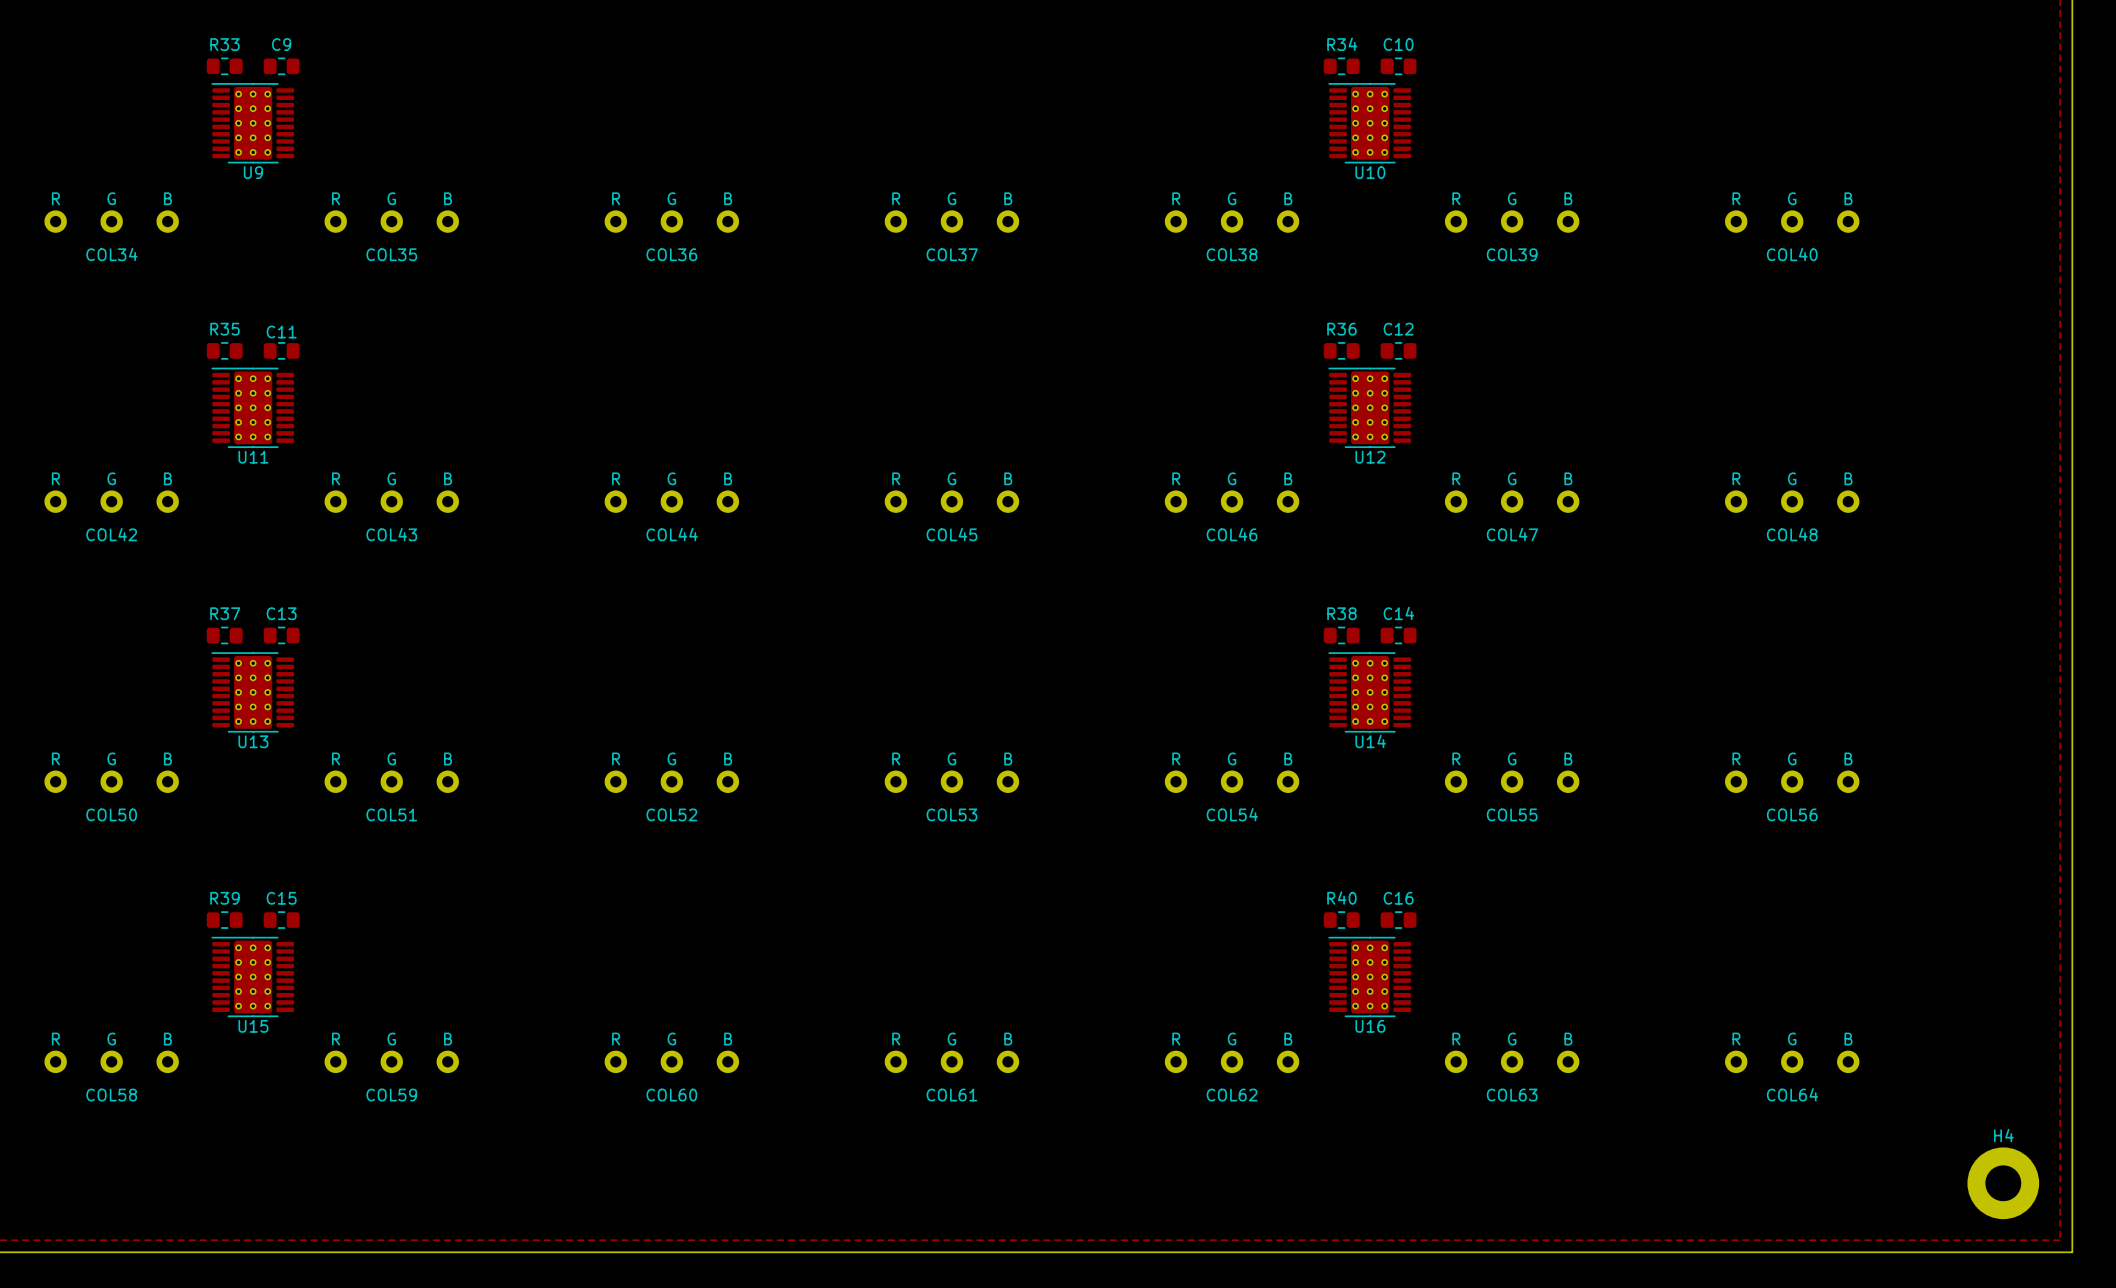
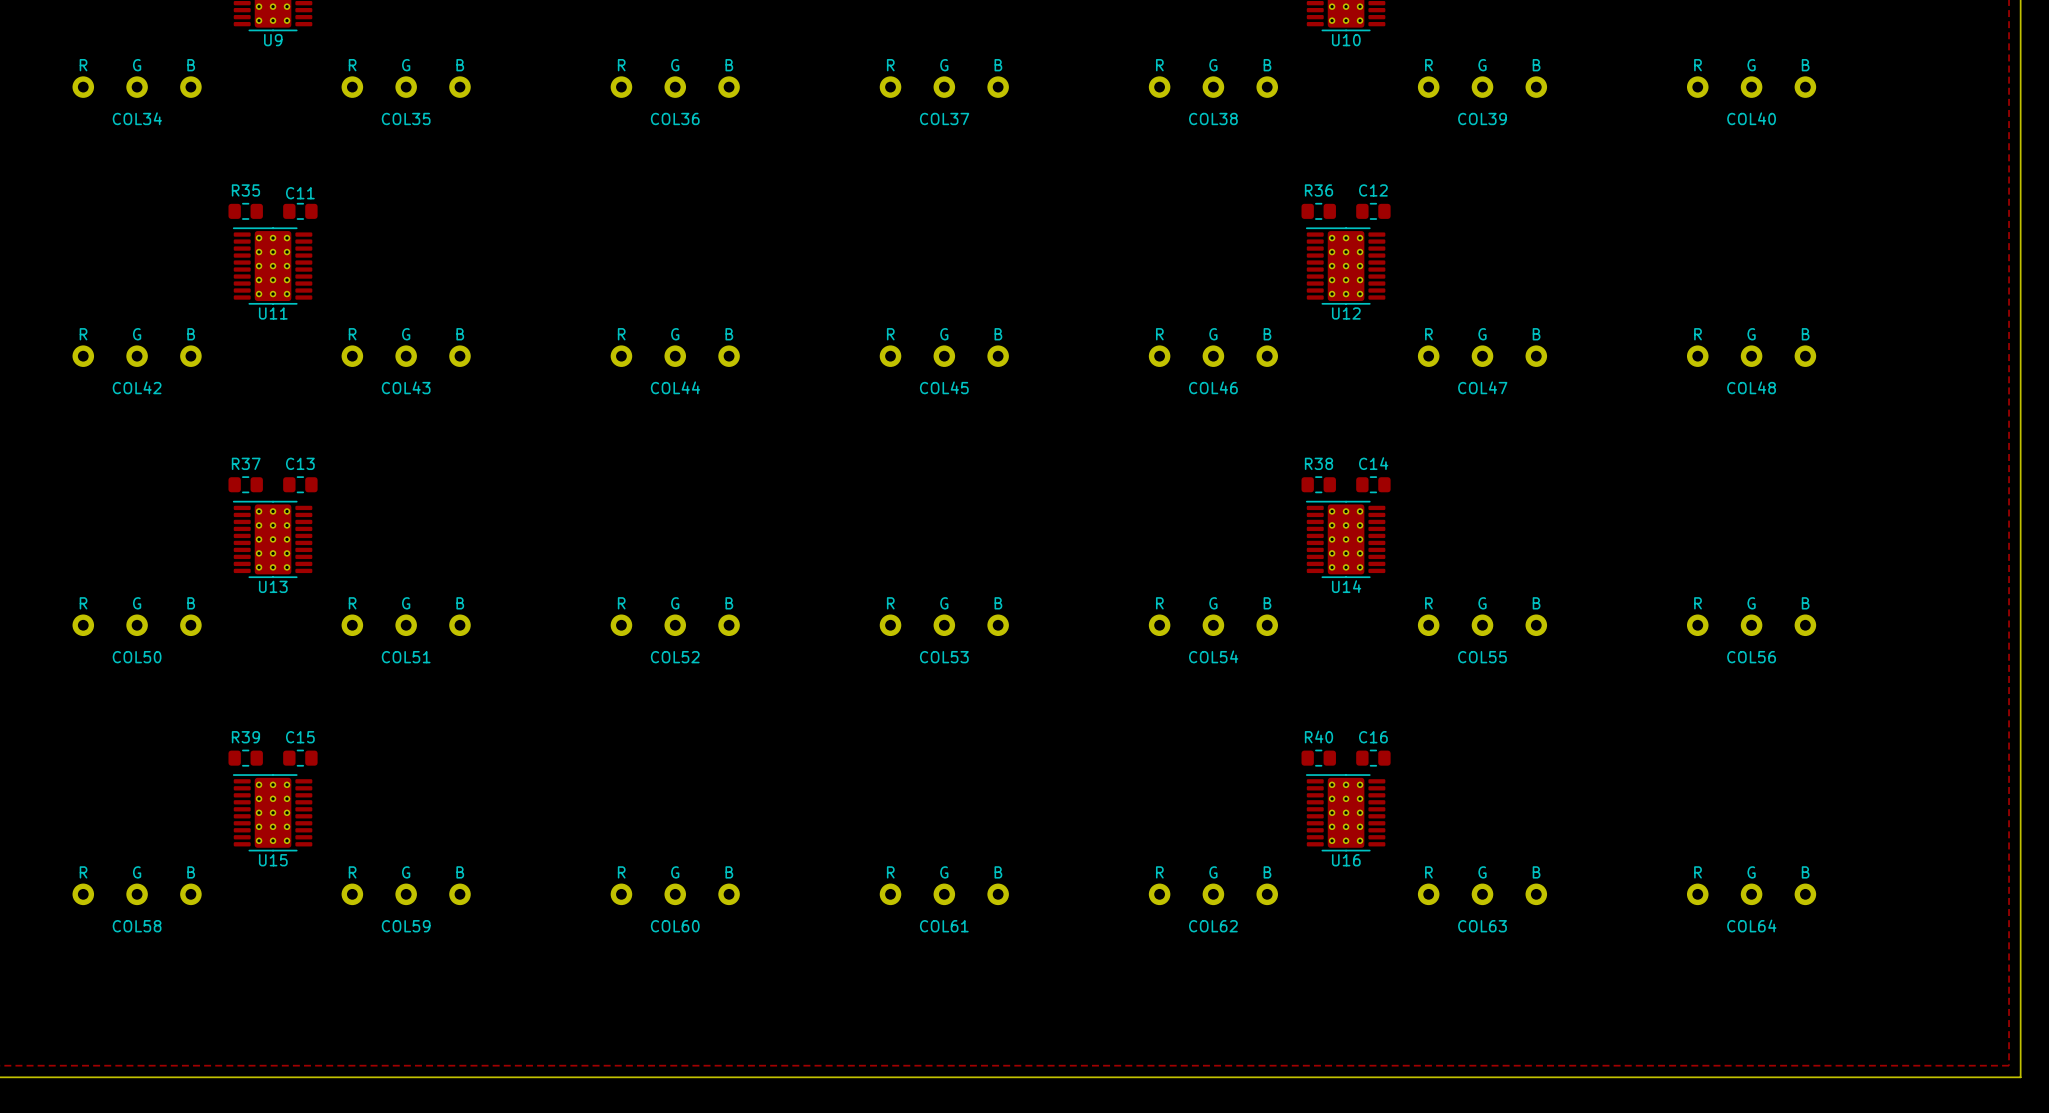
H4: (2003, 1183) -> none

